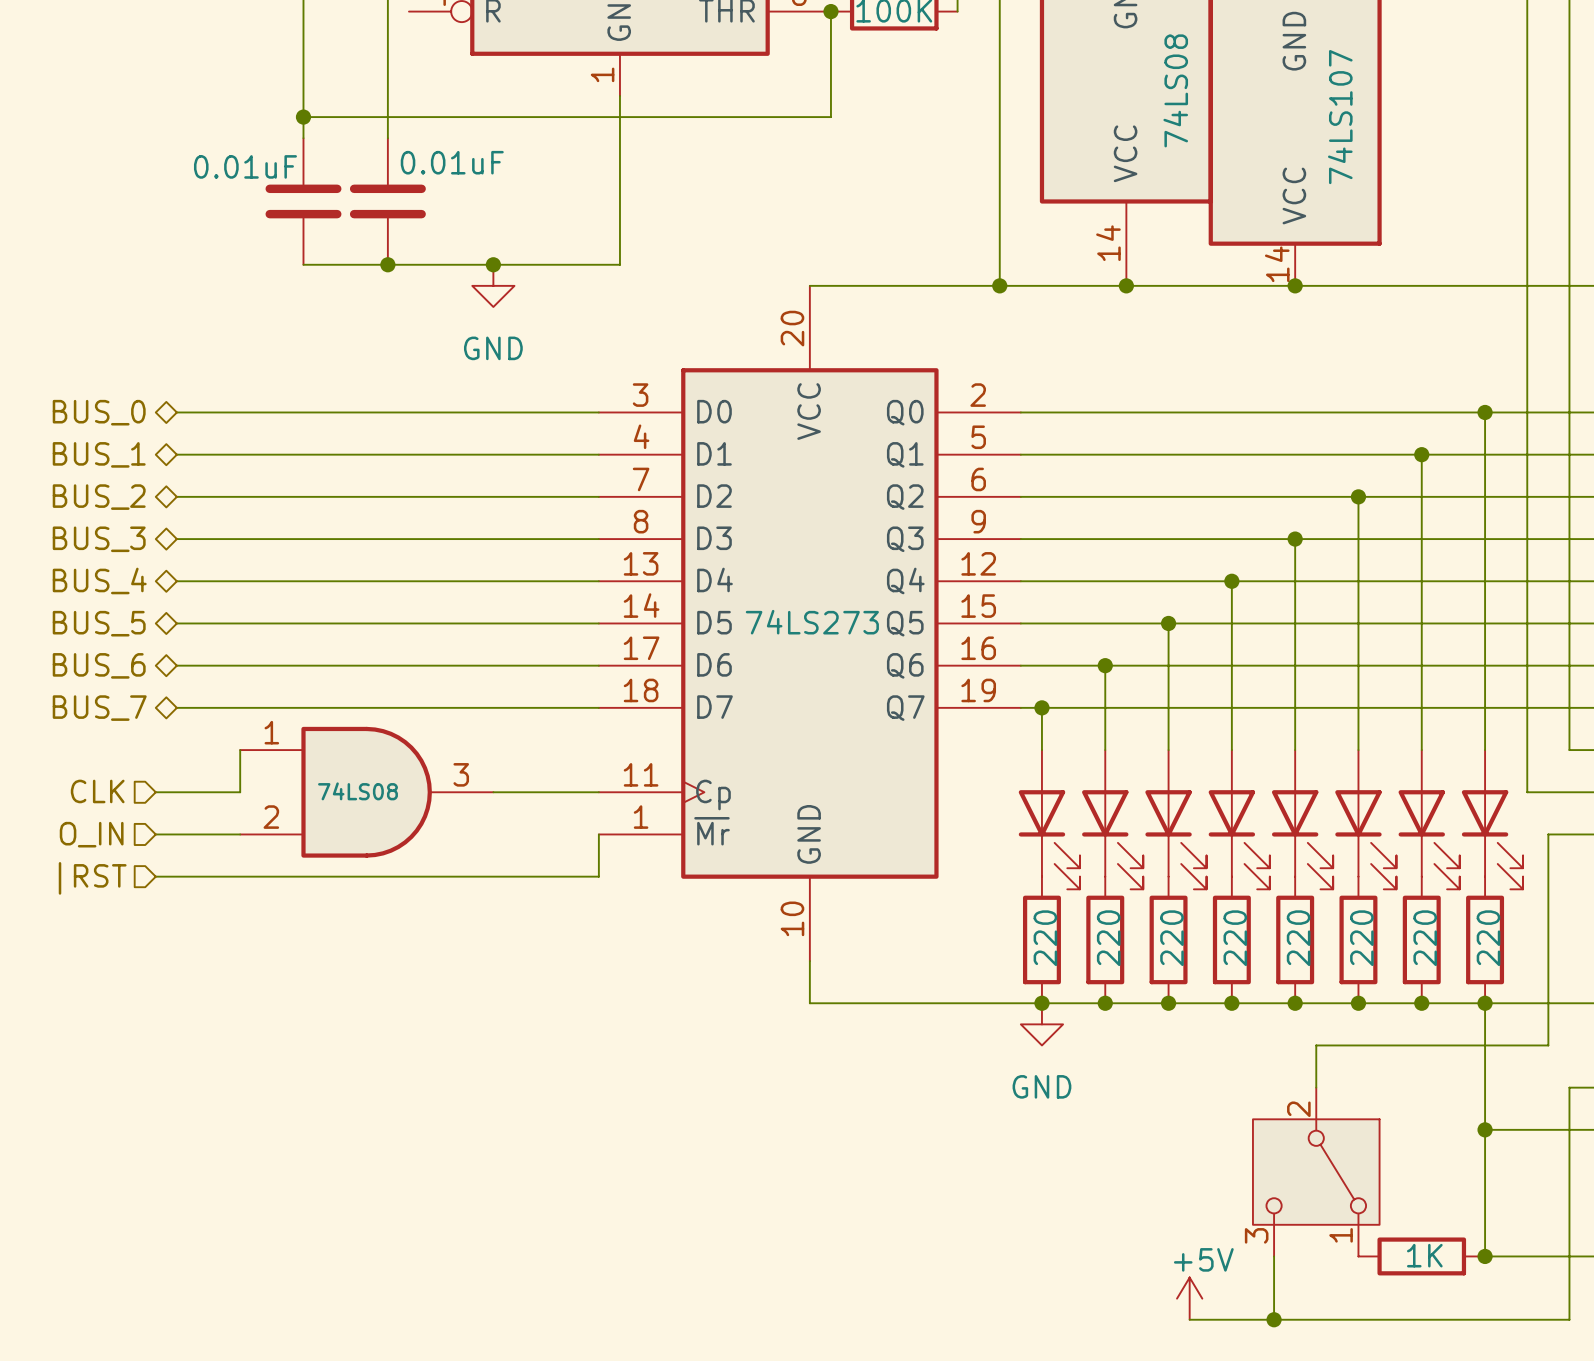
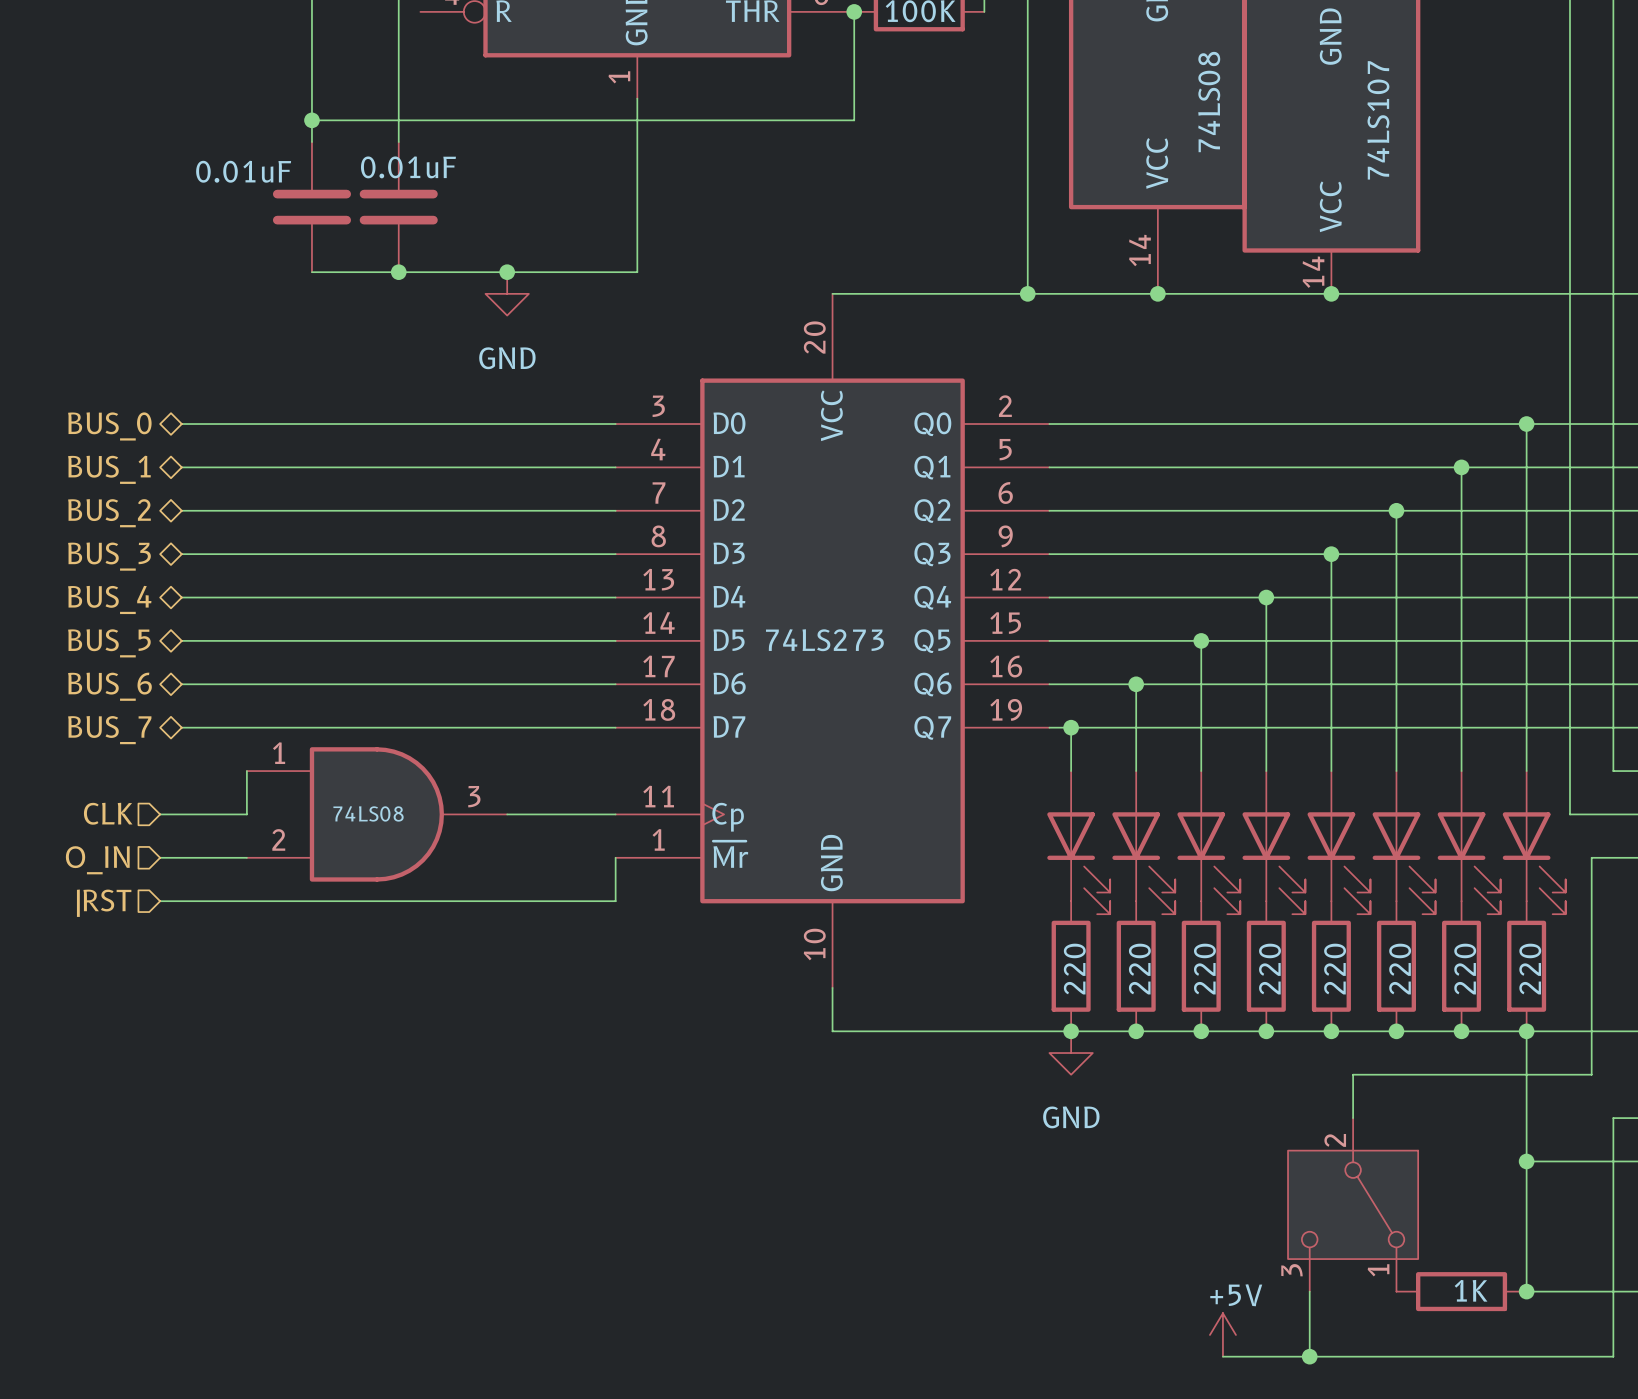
part value position: 0.01uF (452, 162) -> 0.01uF (408, 167)

